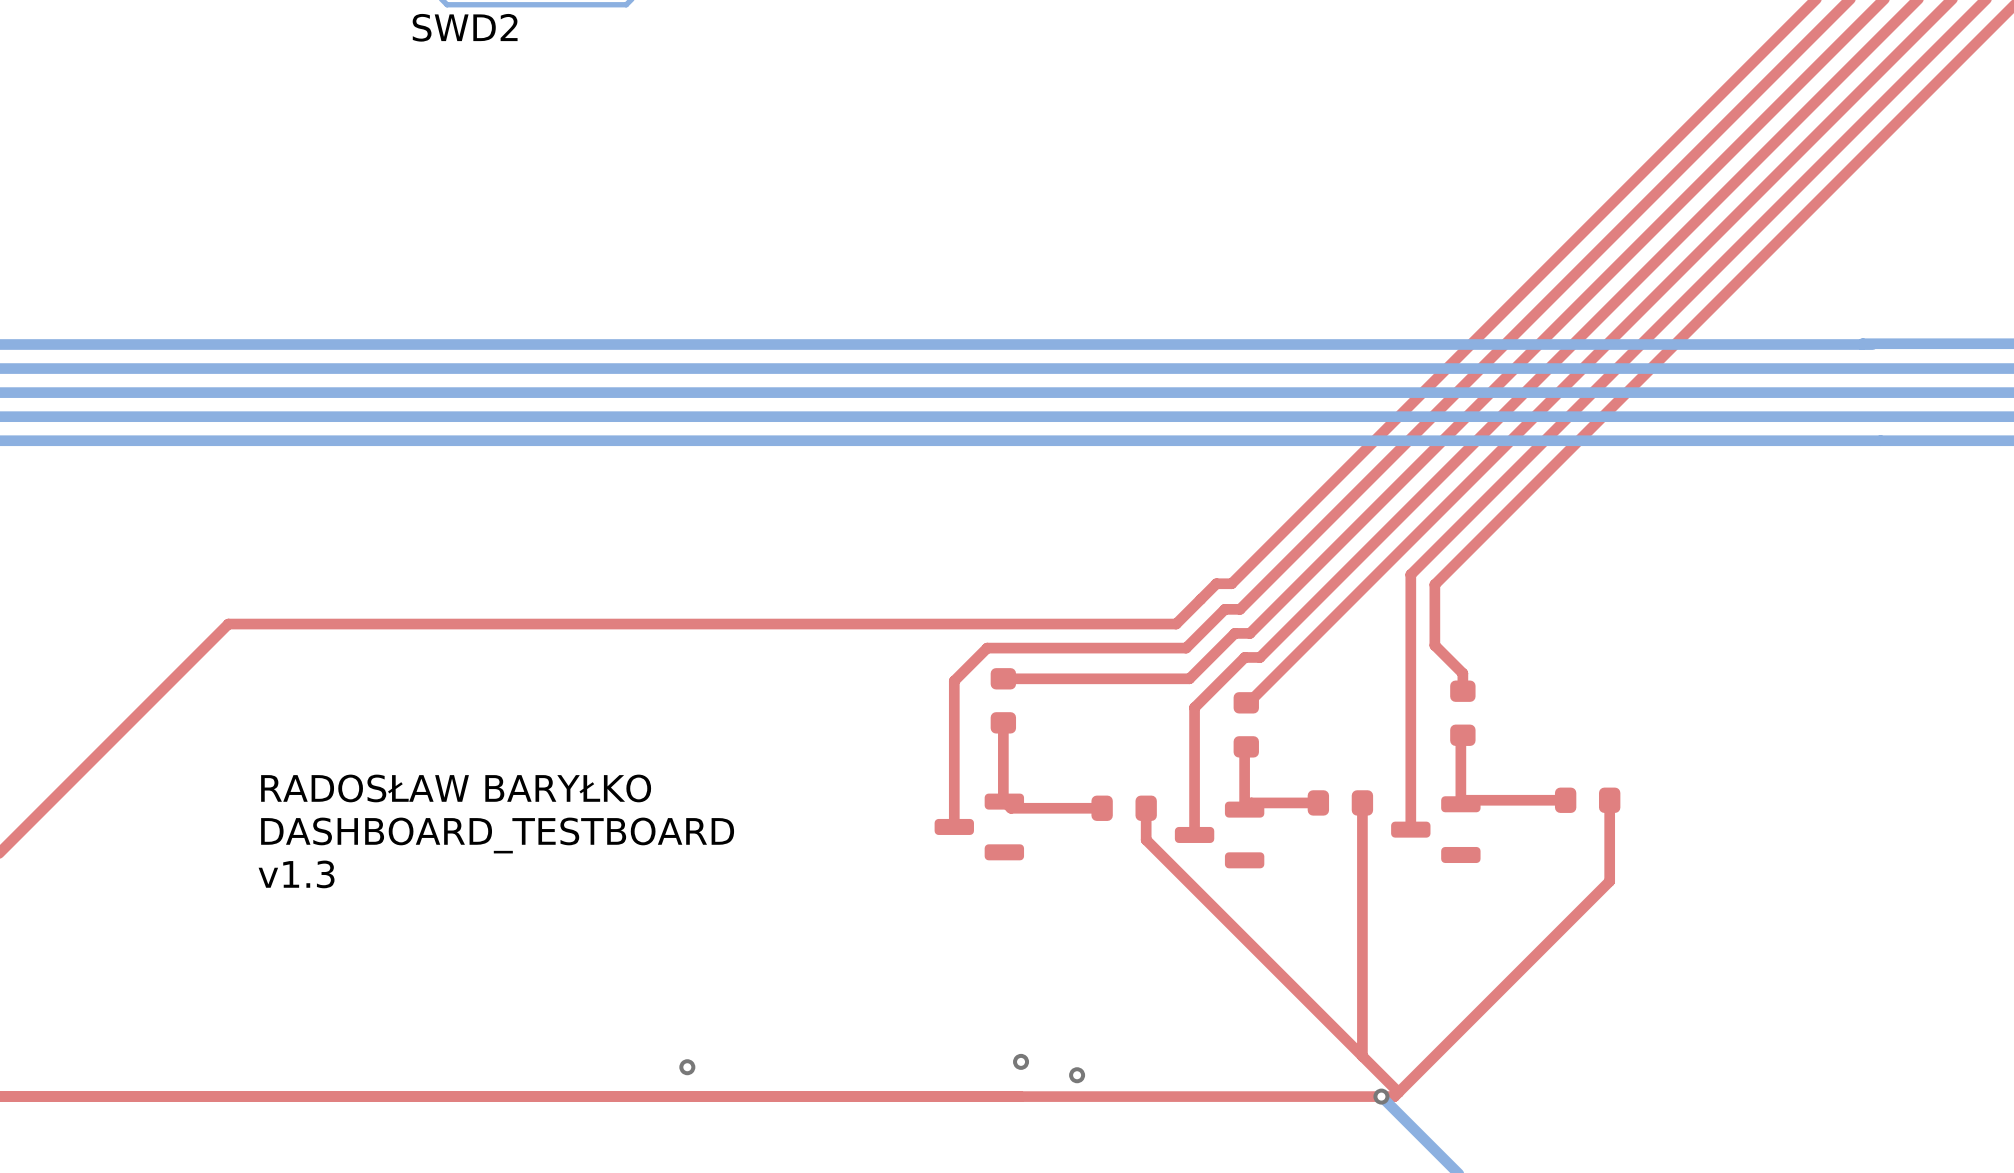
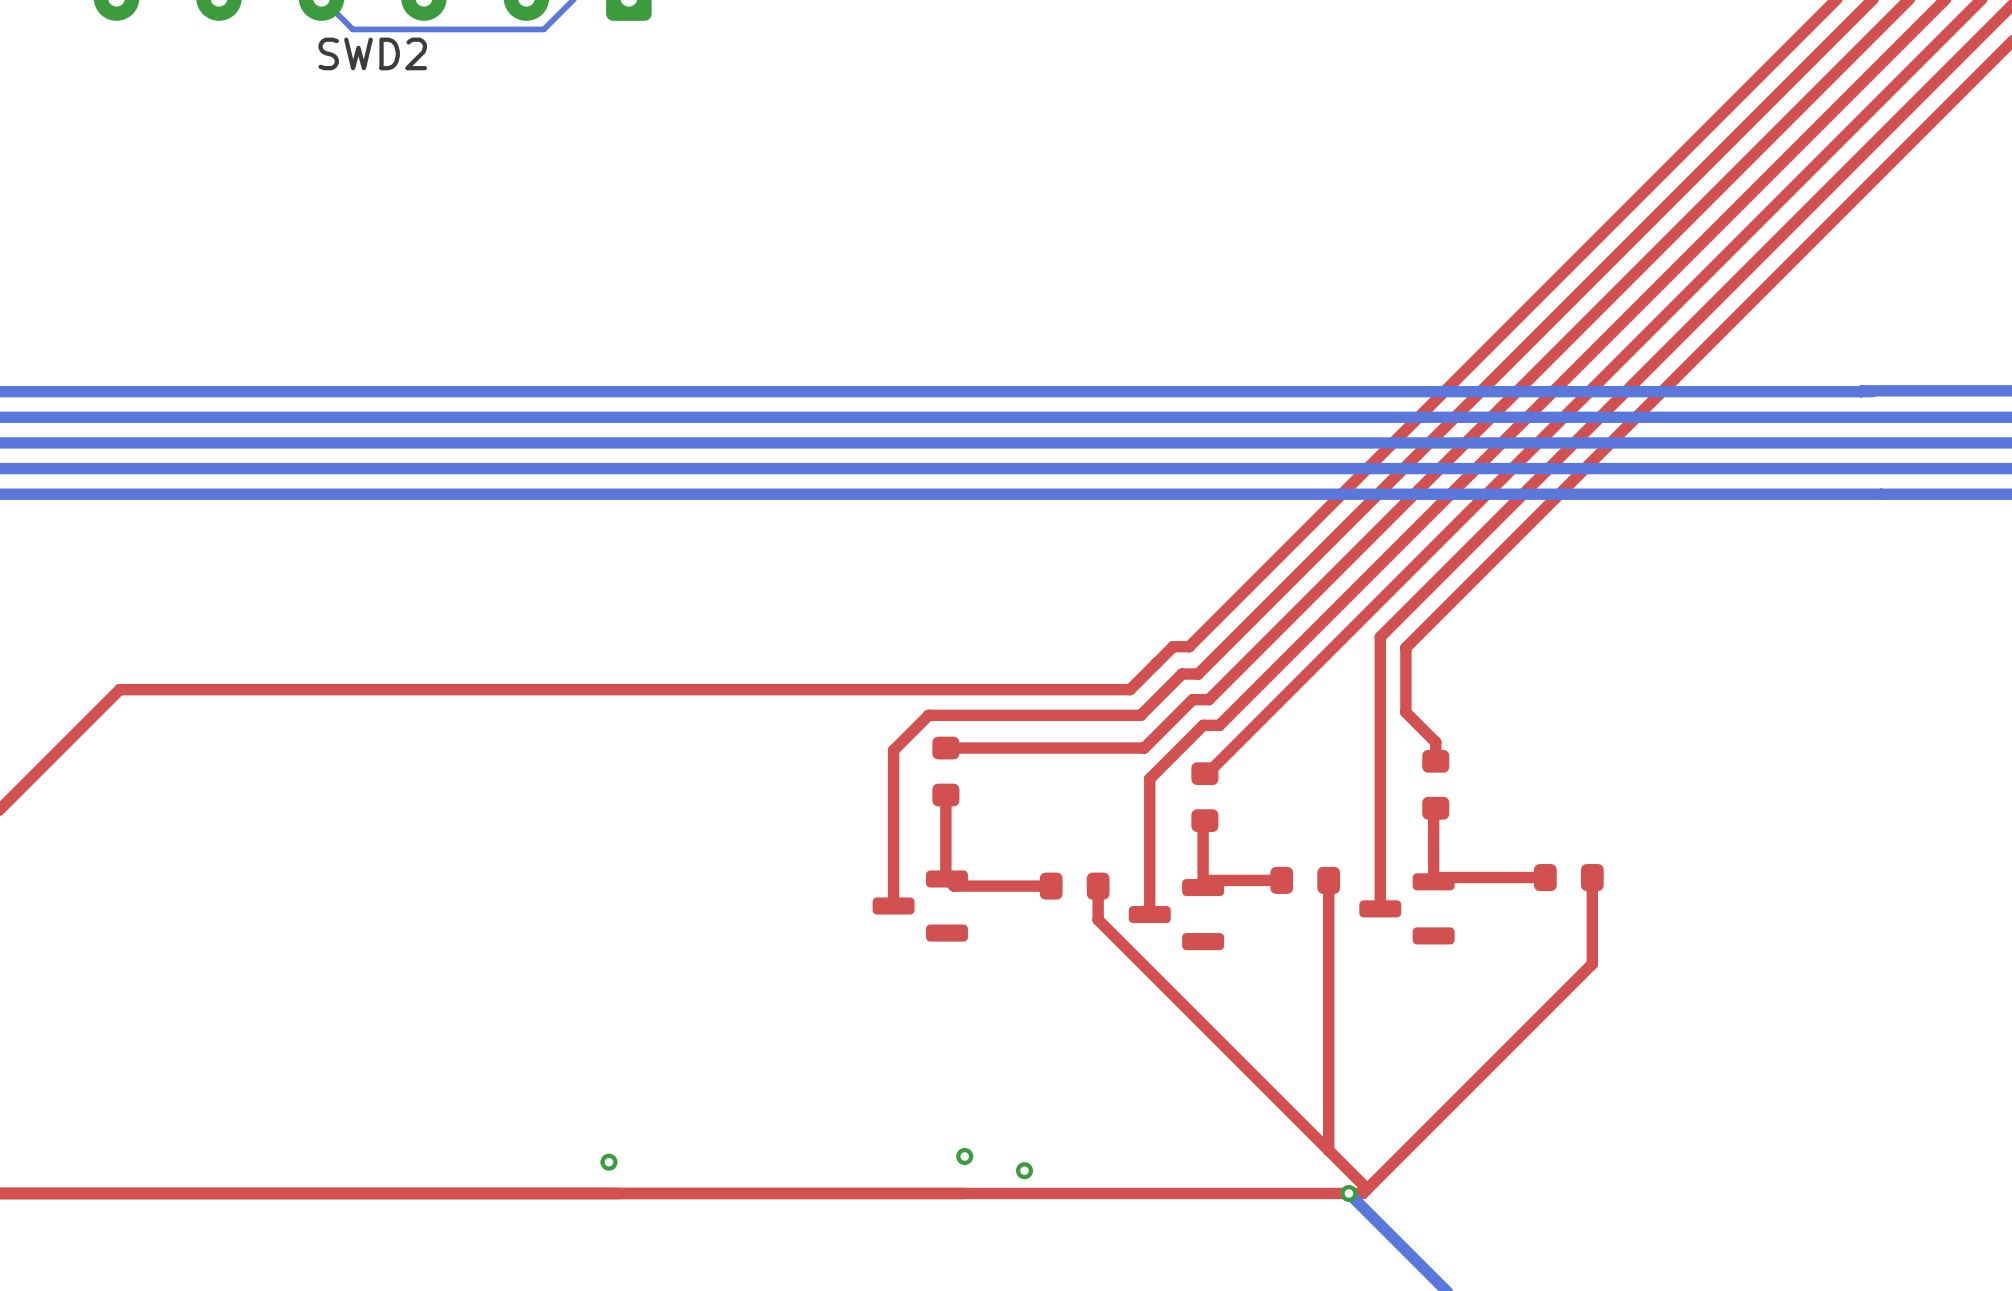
text: RADOSŁAW BARYŁKO (456, 788) -> none
text: DASHBOARD_TESTBOARD (497, 835) -> none
text: v1.3 (296, 874) -> none

